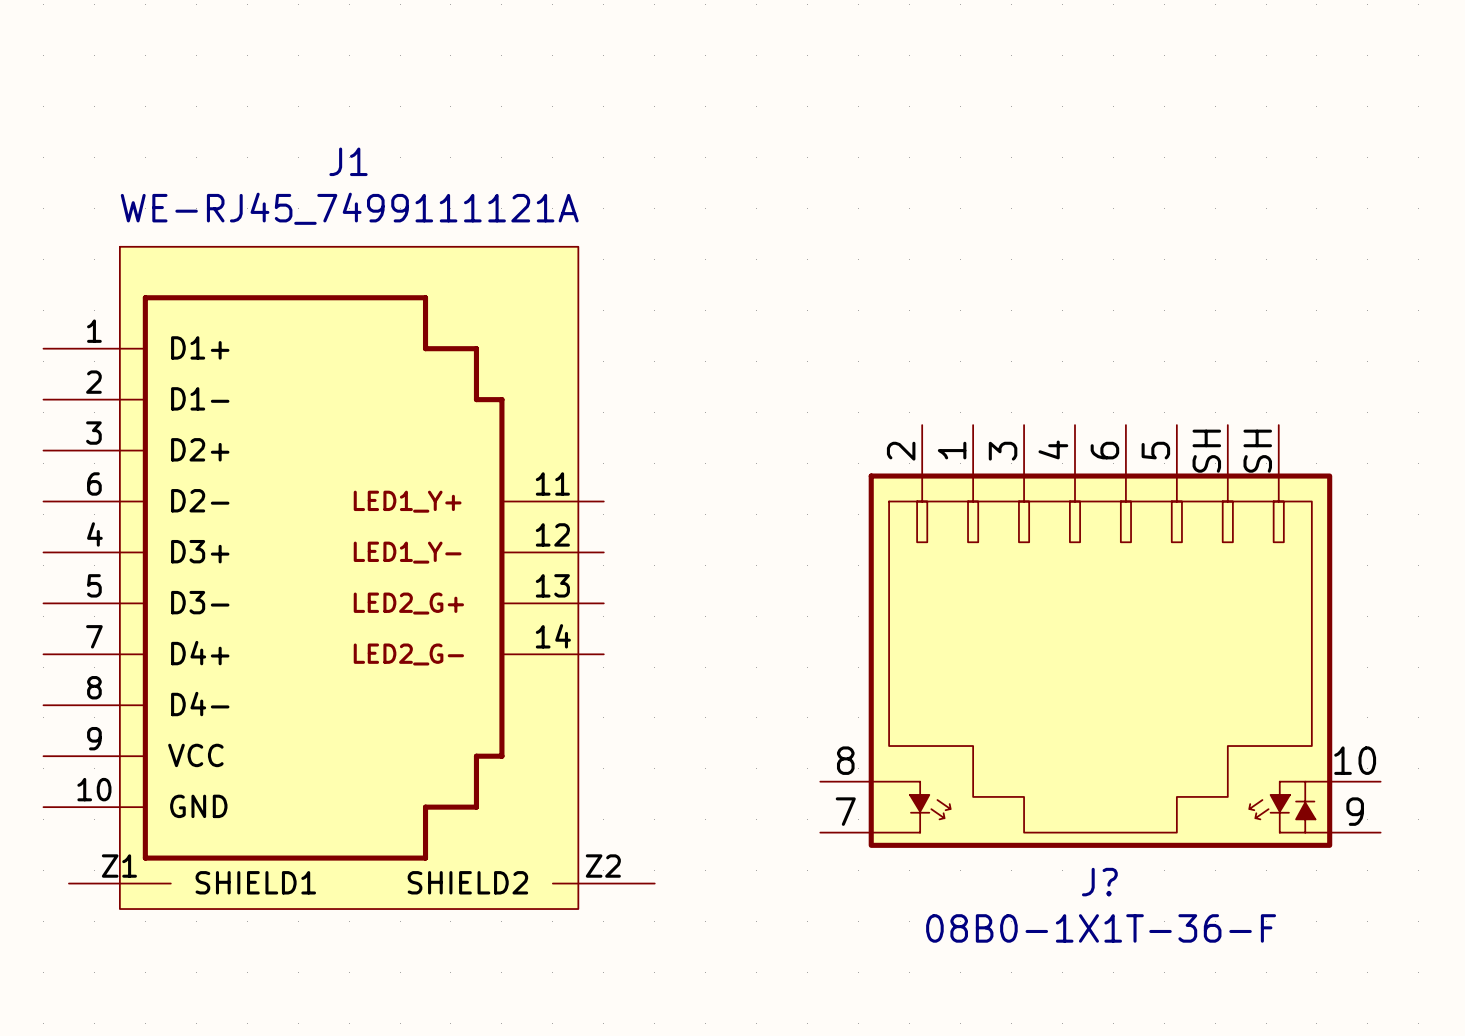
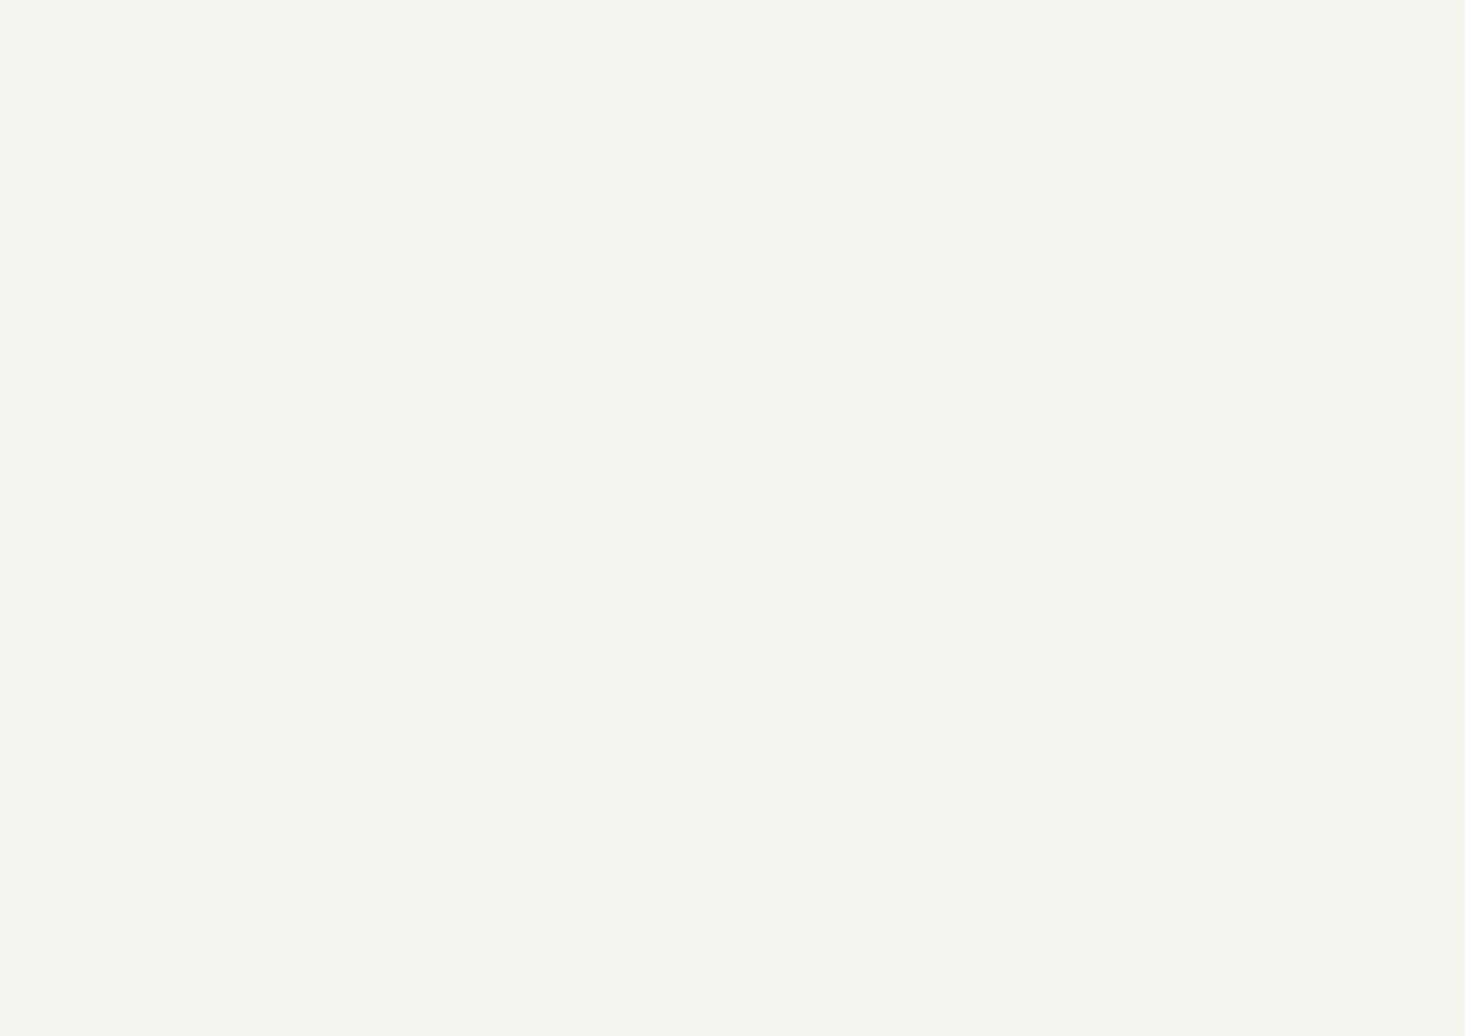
J1: WE-RJ45_7499111121A (349, 577) -> none
J?: 08B0-1X1T-36-F (1100, 636) -> none

